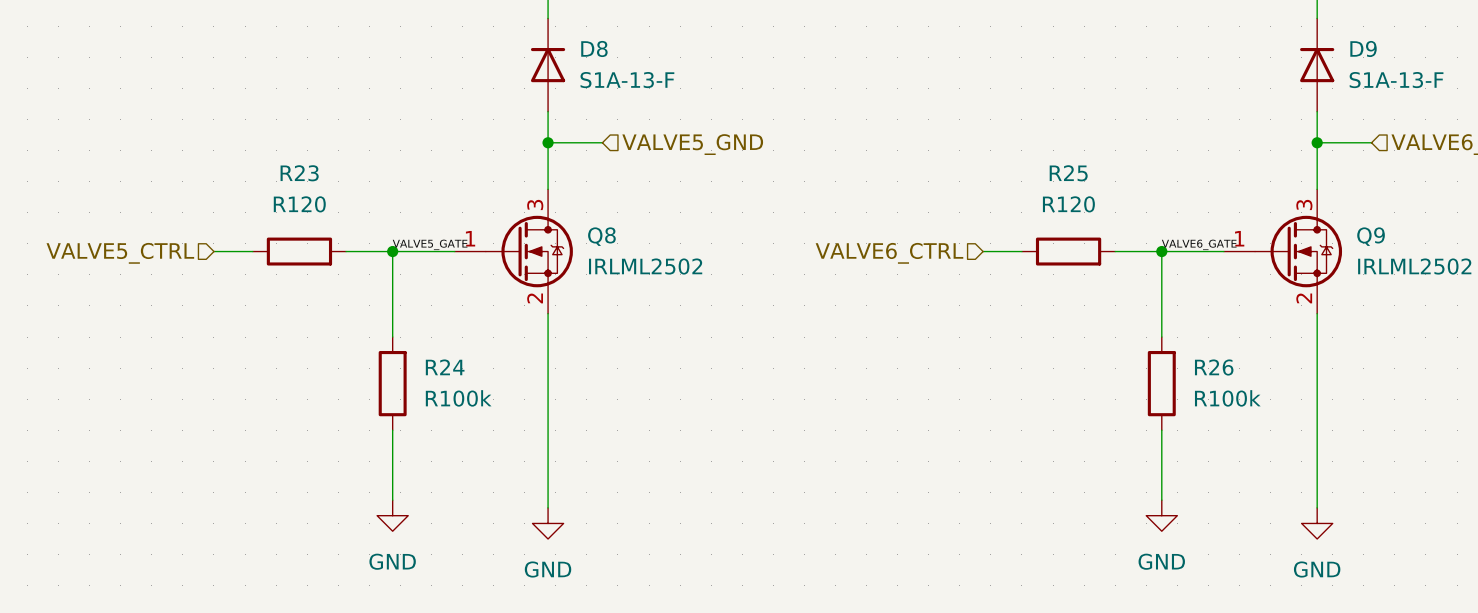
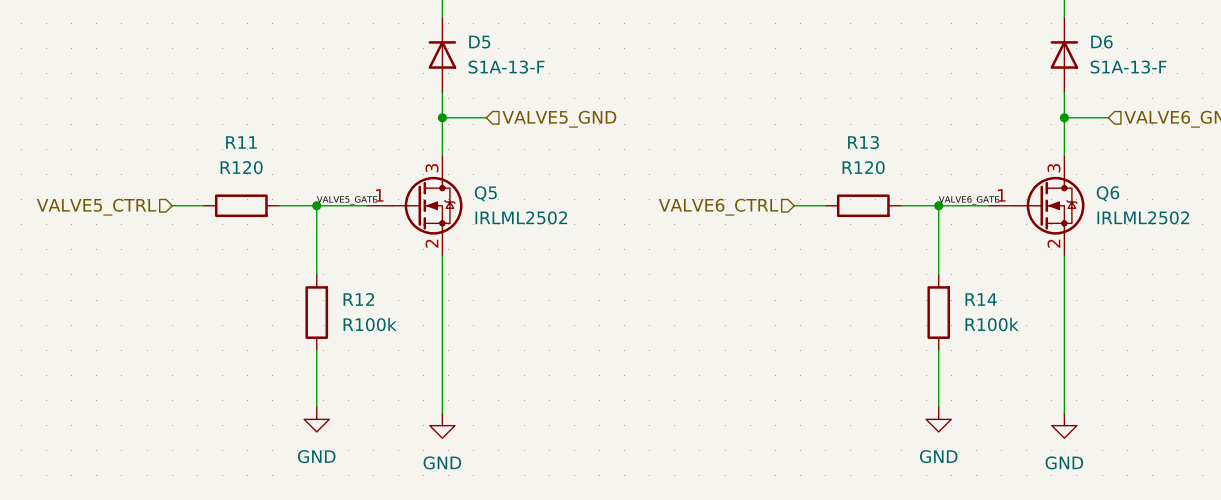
D8 name: D8 (594, 48) -> D5 (479, 42)
D9 name: D9 (1363, 48) -> D6 (1101, 41)
R23 name: R23 (299, 173) -> R11 (241, 142)
R25 name: R25 (1068, 173) -> R13 (863, 142)
Q8 name: Q8 (601, 236) -> Q5 (485, 193)
Q9 name: Q9 (1371, 236) -> Q6 (1107, 193)
R24 name: R24 (445, 367) -> R12 (358, 299)
R26 name: R26 (1214, 367) -> R14 (981, 299)

